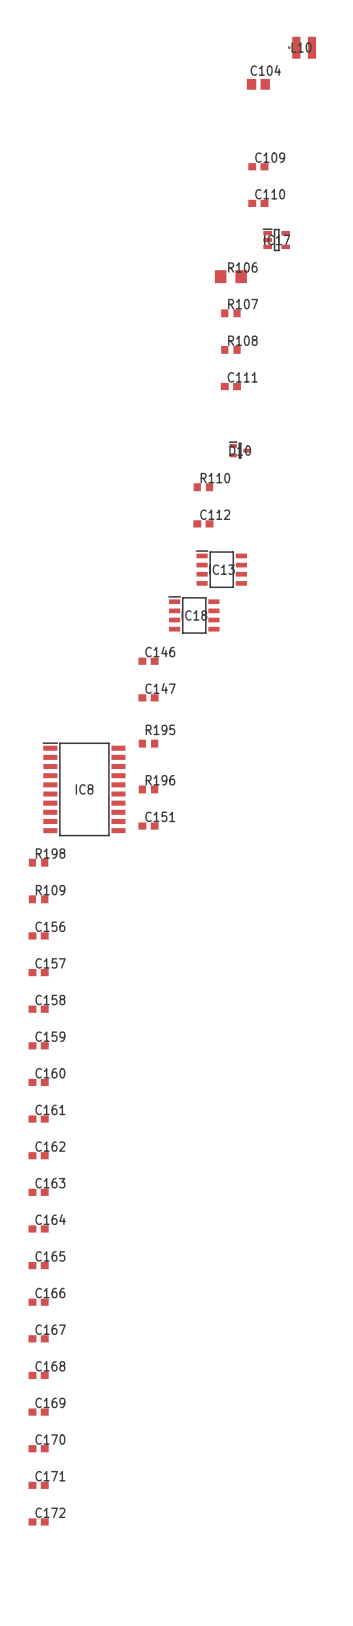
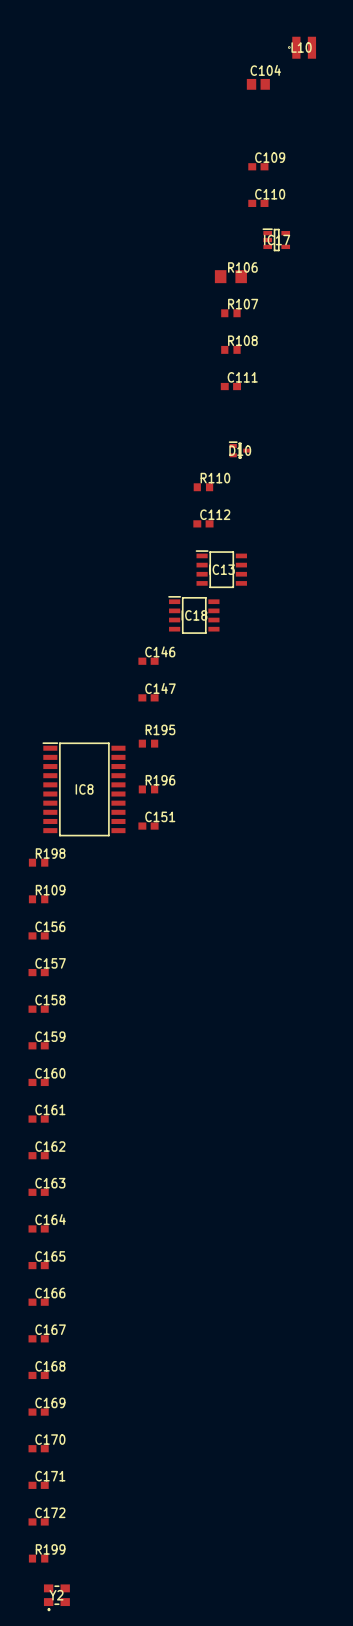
R199: none -> (38, 1558)
Y2: none -> (56, 1597)

